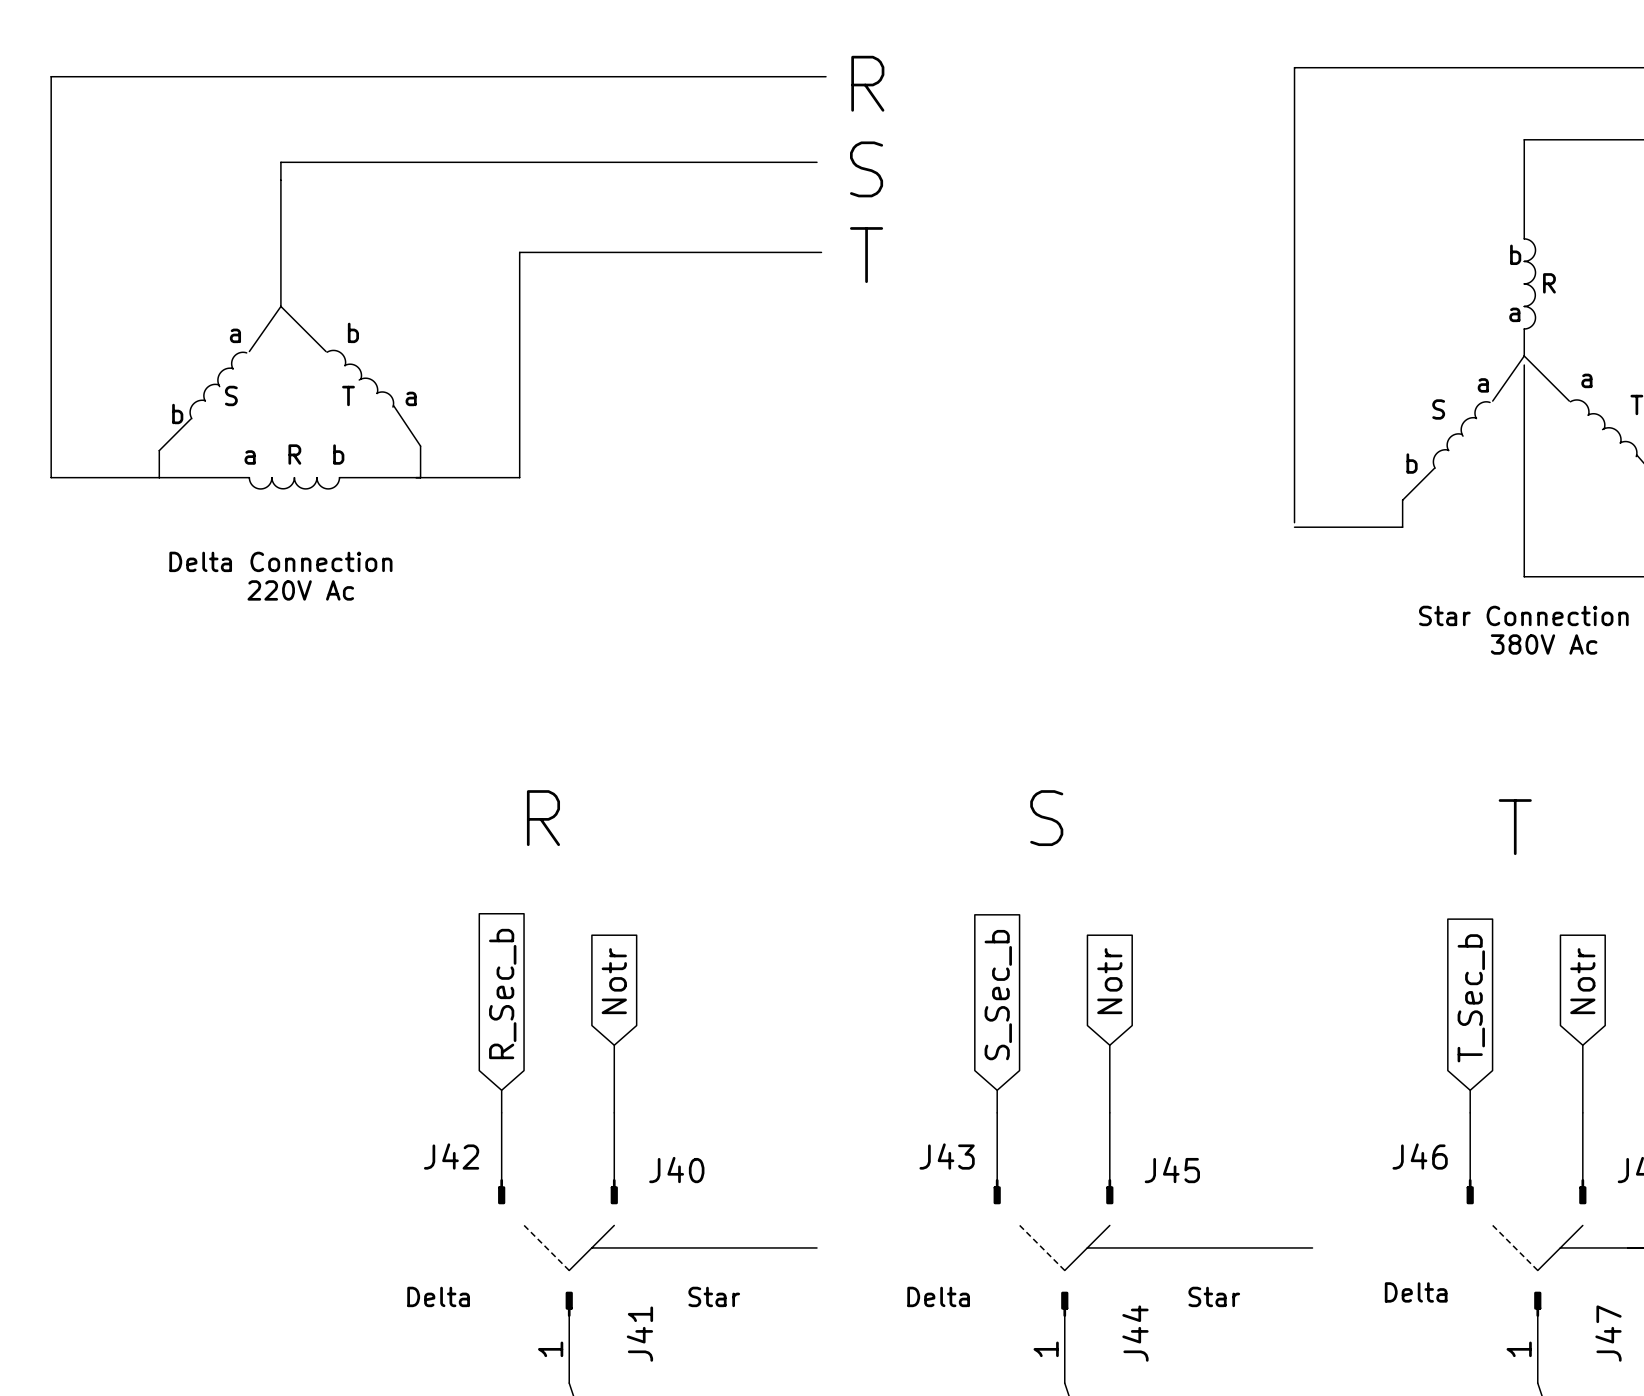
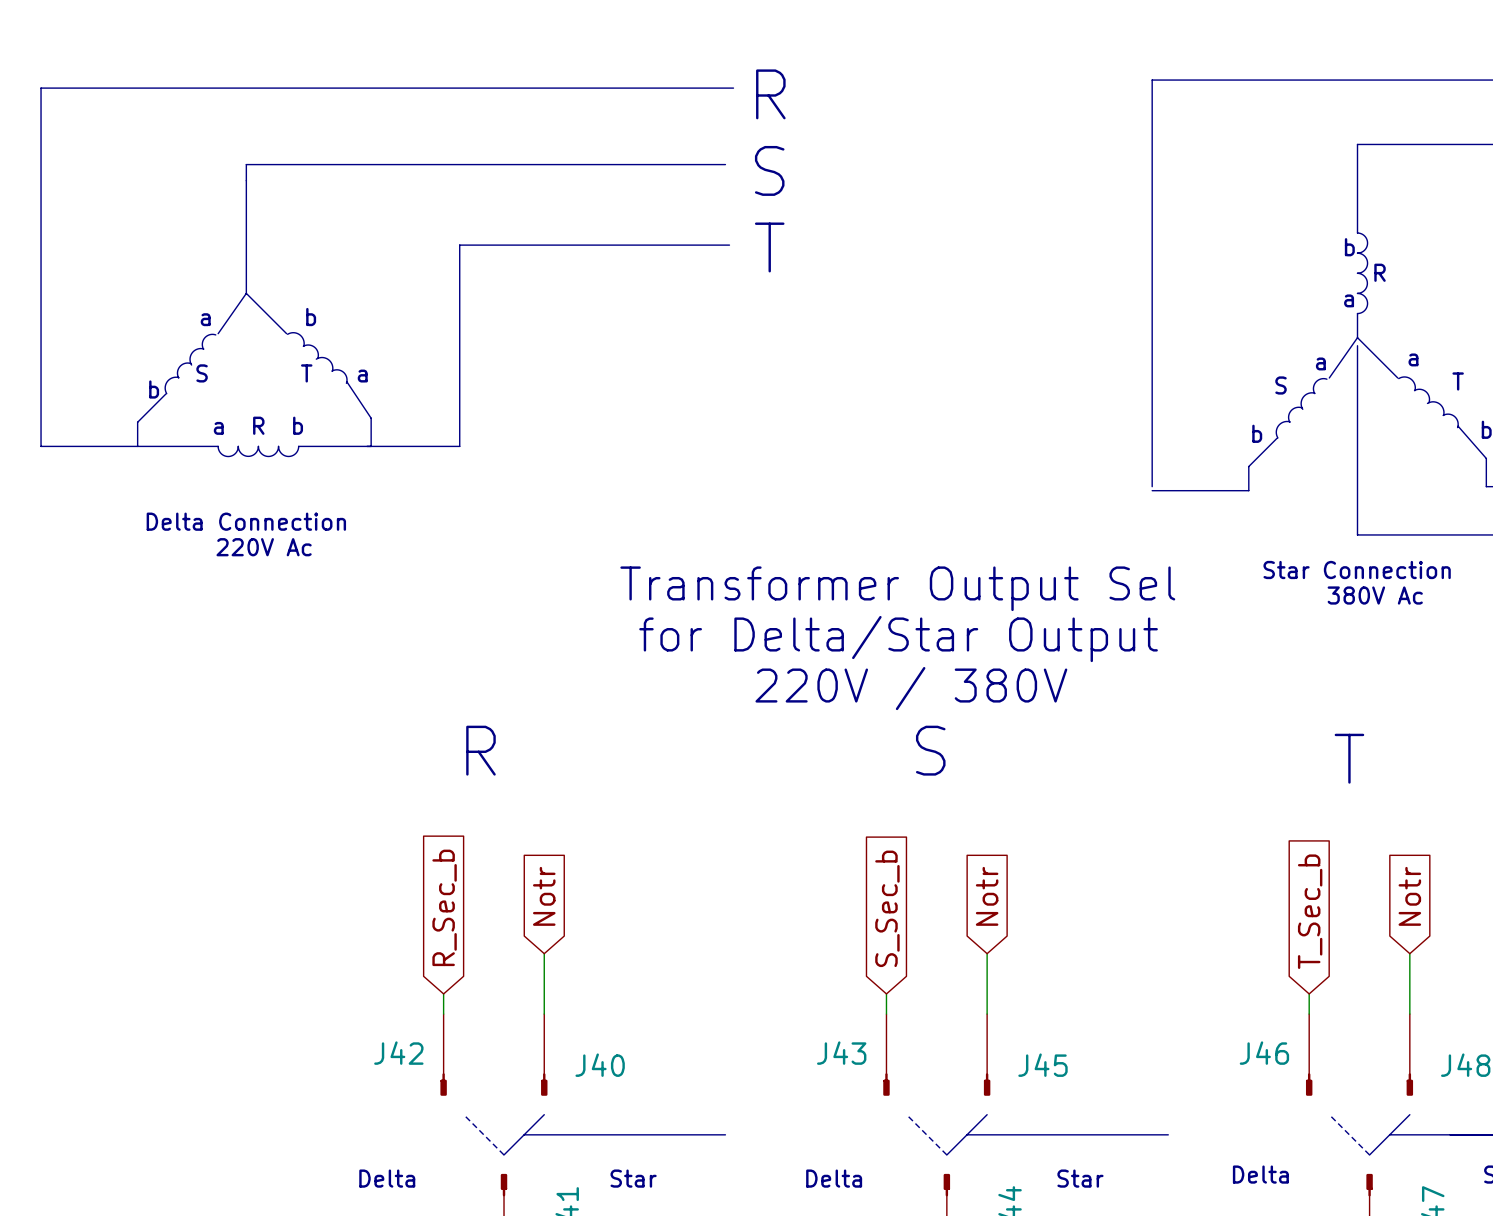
text: none -> Transformer Output Sel (897, 588)
text: none -> for Delta/Star Output (898, 639)
text: none -> 220V / 380V (911, 688)

